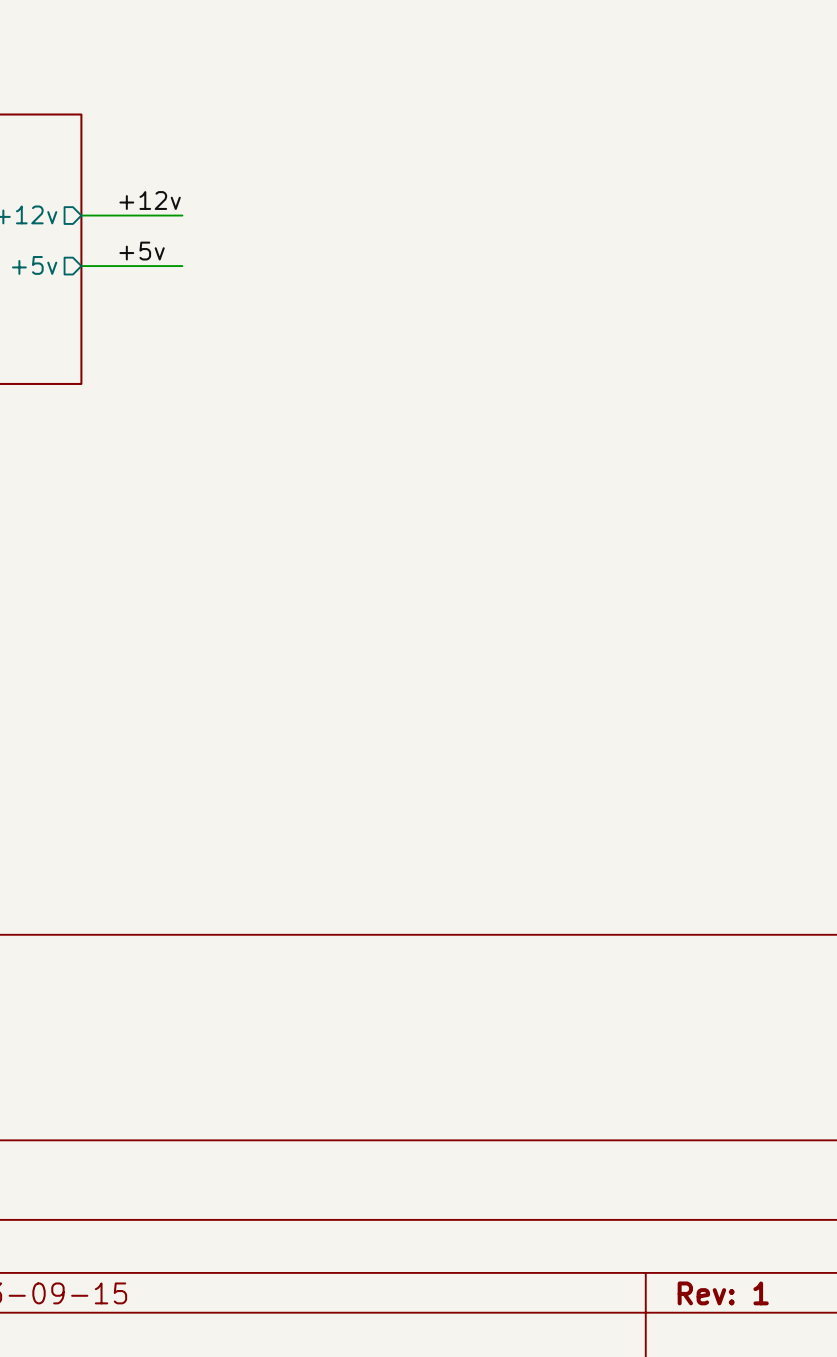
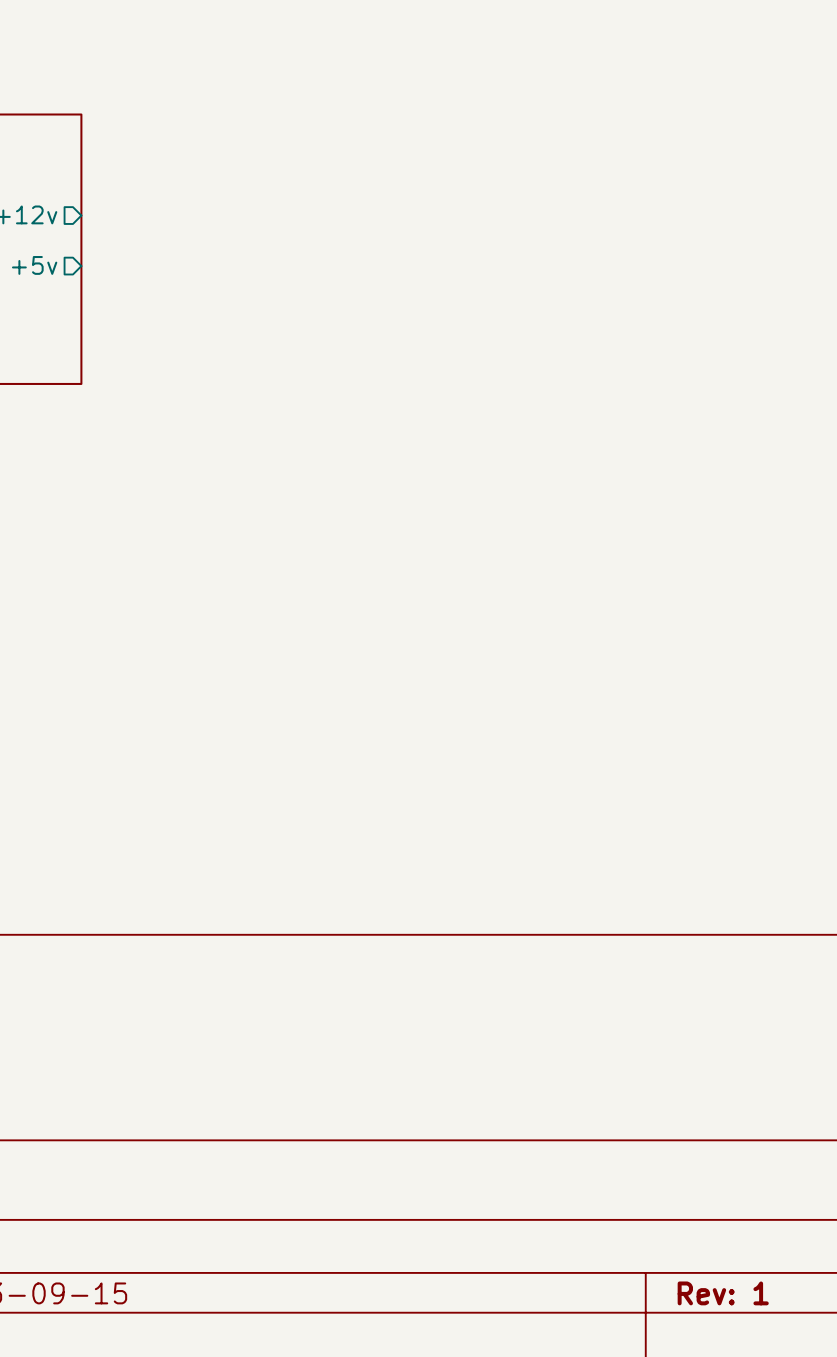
label: +12v (150, 200) -> none
wire: (81, 215) (182, 215) -> none
label: +5v (142, 251) -> none
wire: (81, 266) (182, 266) -> none

